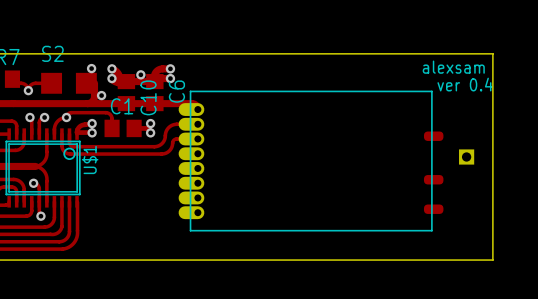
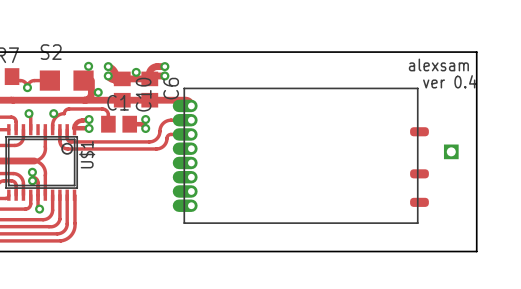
track: (44, 117) (39, 121) (39, 134) -> none
via: (44, 117) -> none
via: none -> (53, 113)
via: (66, 117) -> none
via: none -> (32, 172)
via: (33, 183) -> none
via: none -> (32, 180)

